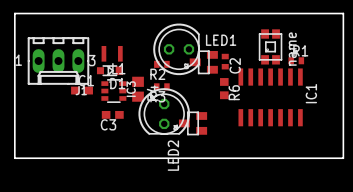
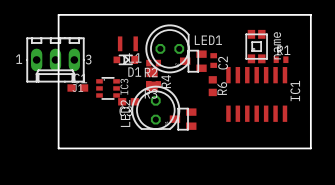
board edge: (61, 13) (14, 13) (14, 158) (343, 158) (343, 13) (327, 13) -> (58, 14) (58, 148) (310, 148) (310, 14)
L1 position: (112, 53) -> (127, 43)
D1 position: (109, 70) -> (125, 59)
R4 position: (138, 89) -> (152, 79)
C3 position: (112, 114) -> (128, 101)
LED2 name position: LED2 (173, 155) -> LED2 (125, 113)

